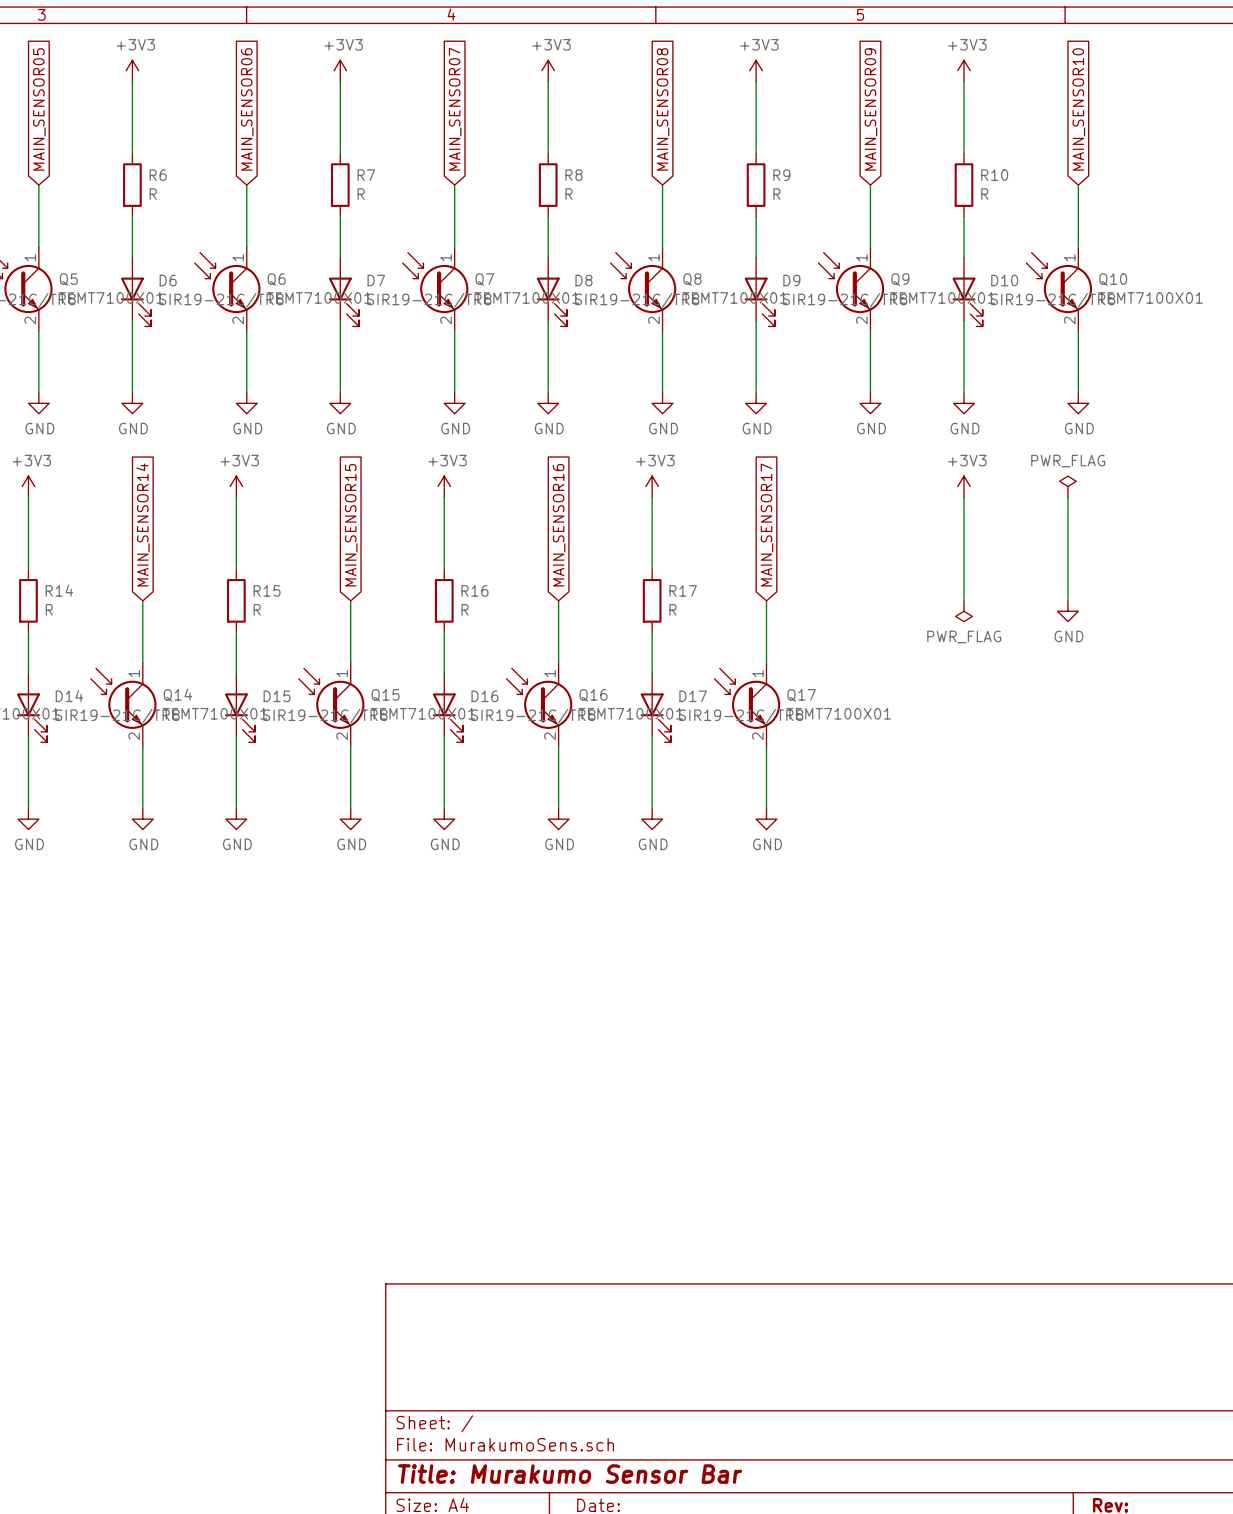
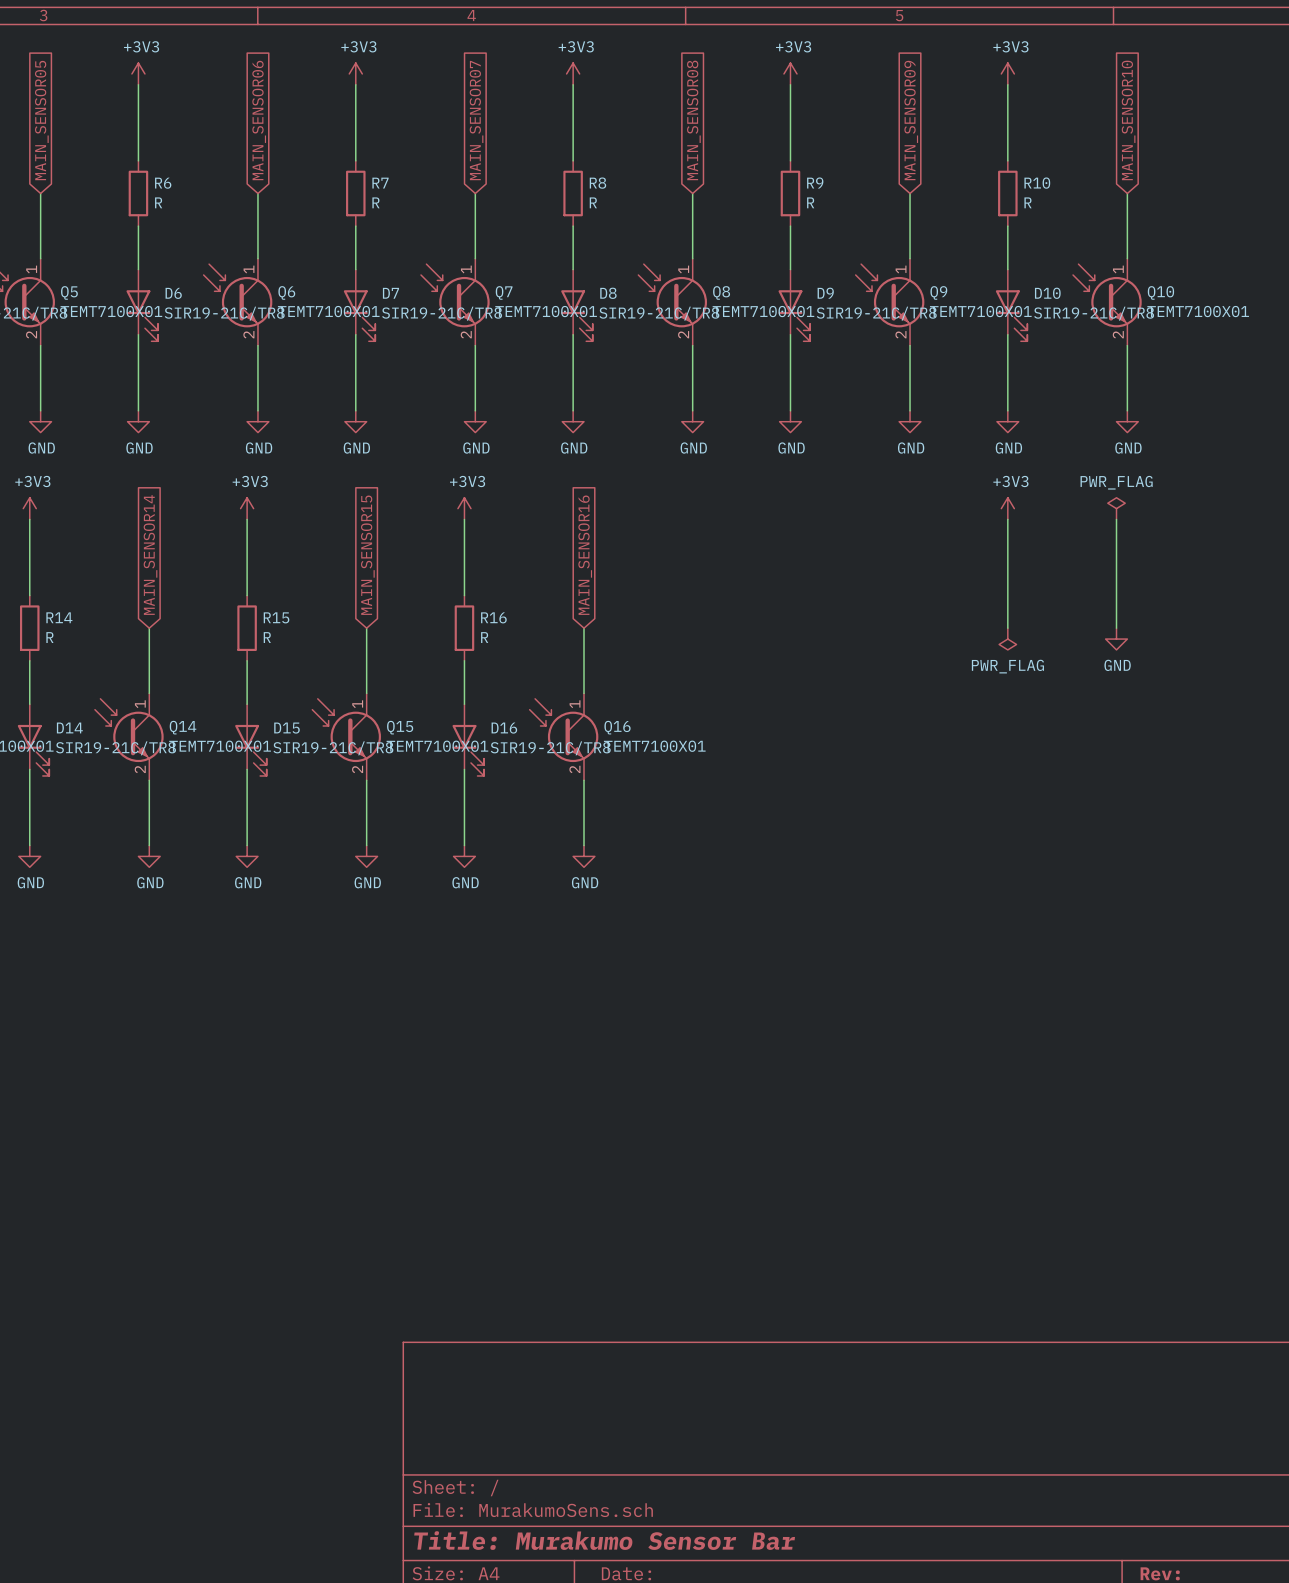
power symbol: +3V3 (652, 486) -> none
wire: (652, 496) (652, 569) -> none
global label: MAIN_SENSOR17 (766, 524) -> none
R17: R (652, 600) -> none
wire: (766, 600) (766, 663) -> none
wire: (652, 632) (652, 673) -> none
Q17: TEMT7100X01 (747, 704) -> none
D17: SIR19-21C/TR8 (655, 707) -> none
wire: (652, 736) (652, 808) -> none
wire: (766, 746) (766, 808) -> none
power symbol: GND (652, 819) -> none
power symbol: GND (766, 819) -> none

